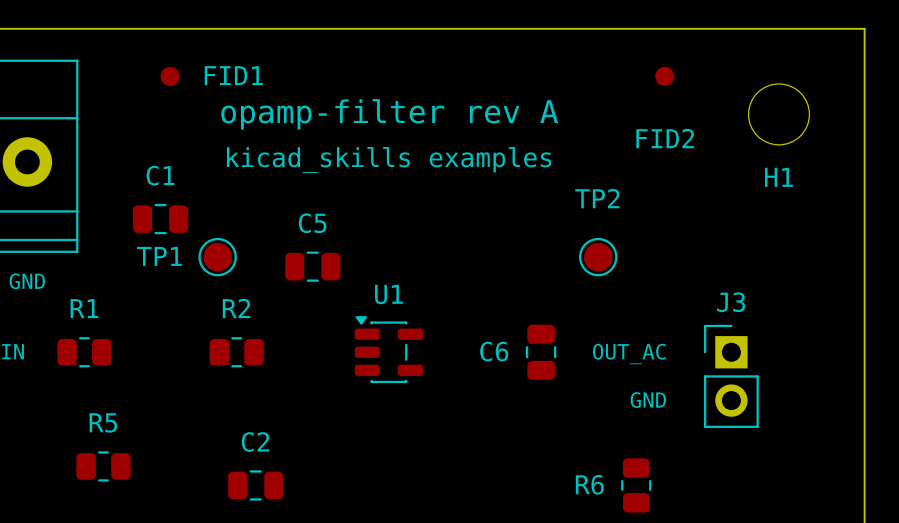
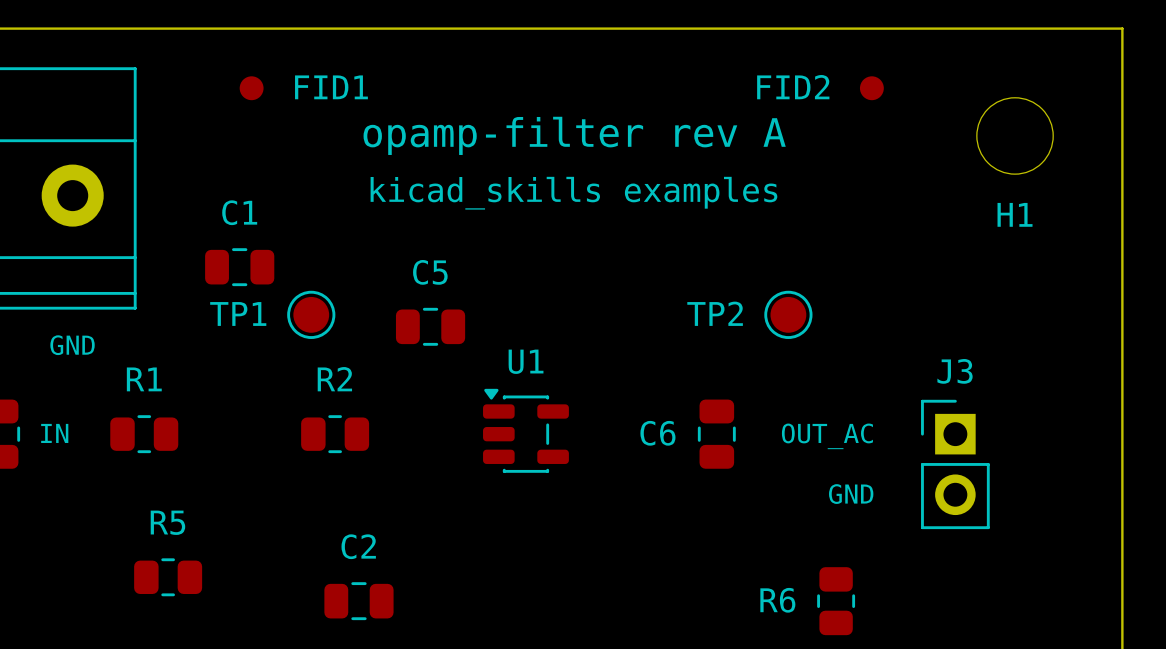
text position: opamp-filter rev A (389, 114) -> opamp-filter rev A (574, 135)
FID2 name position: FID2 (665, 138) -> FID2 (793, 87)
text position: kicad_skills examples (389, 160) -> kicad_skills examples (573, 193)
TP2 name position: TP2 (597, 198) -> TP2 (715, 313)

